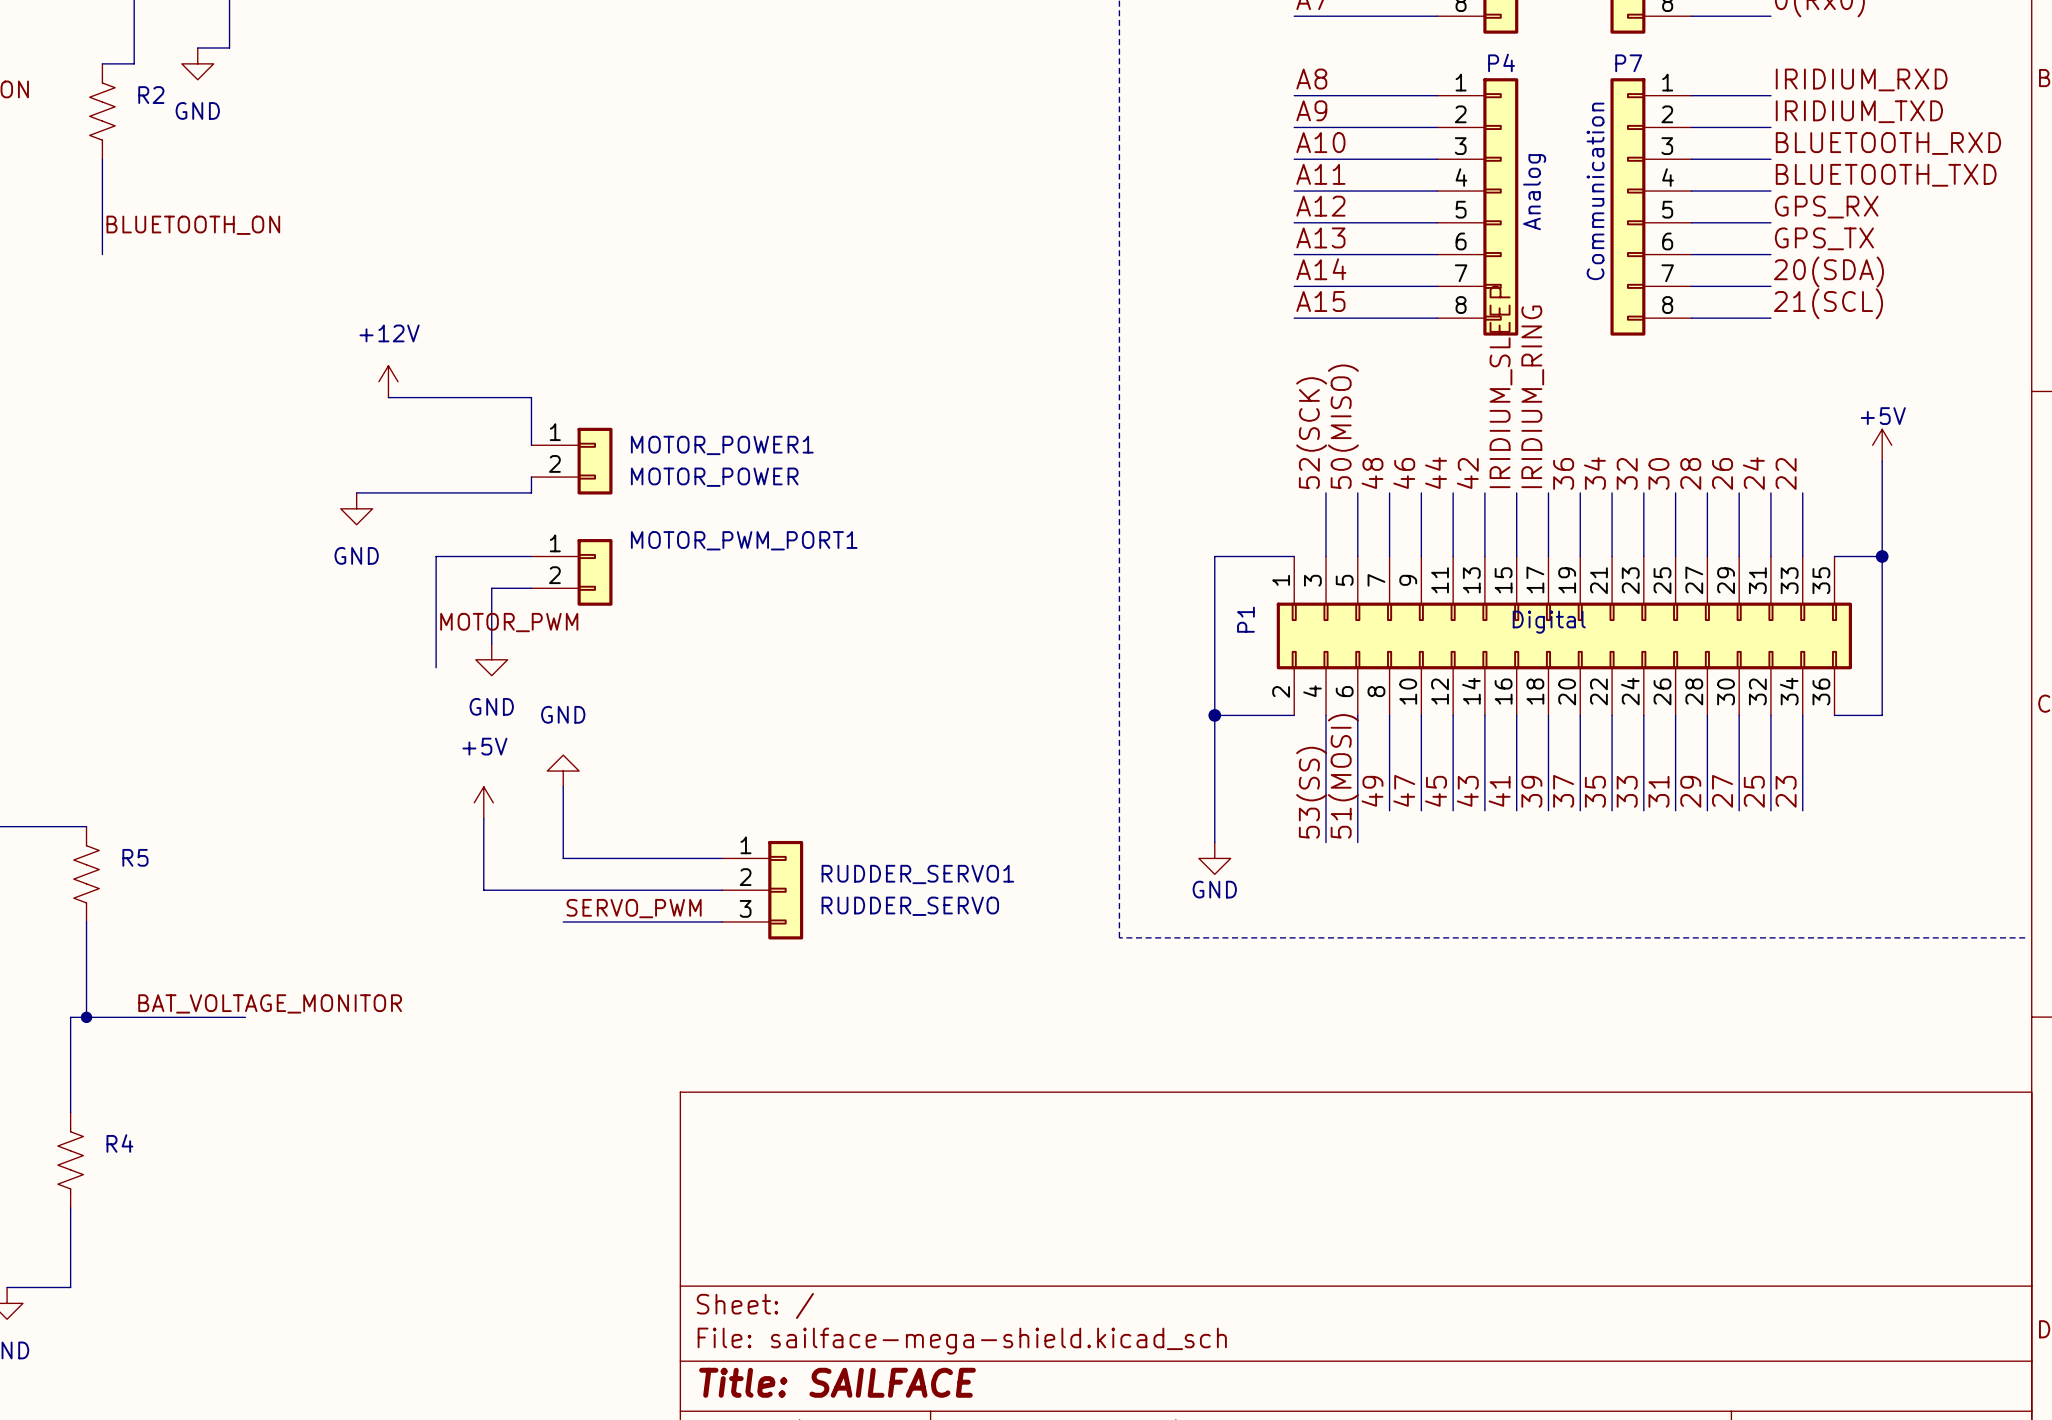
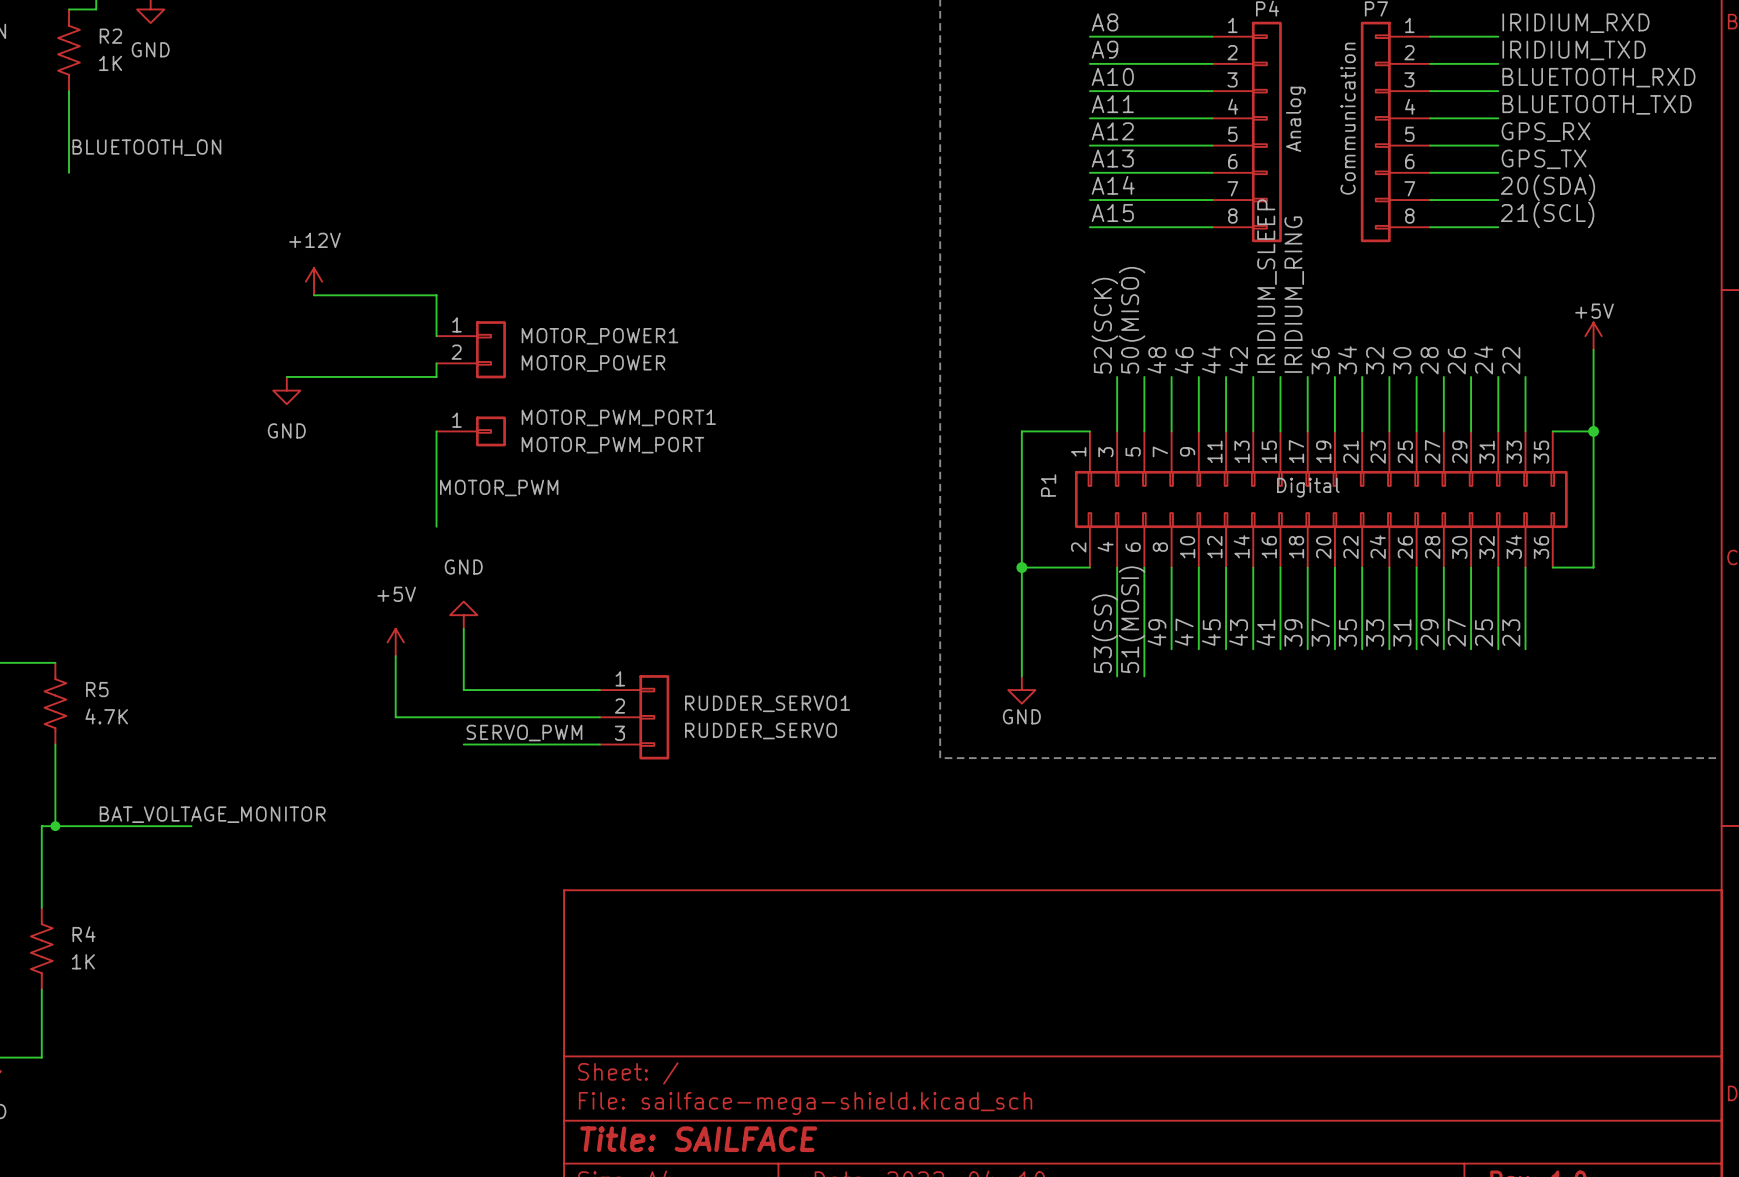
R2 value: none -> 1K (110, 63)
MOTOR_PWM_PORT1 symbol: [531, 539, 613, 606] -> [436, 416, 506, 447]
wire: (531, 556) (436, 556) (436, 667) -> (436, 431) (436, 526)
MOTOR_PWM_PORT1 value: none -> MOTOR_PWM_PORT (612, 445)
wire: (531, 588) (491, 588) (491, 643) -> none
label position: MOTOR_PWM (509, 622) -> MOTOR_PWM (499, 487)
power symbol: GND (491, 659) -> none
R5 value: none -> 4.7K (106, 716)
R4 value: none -> 1K (83, 961)

